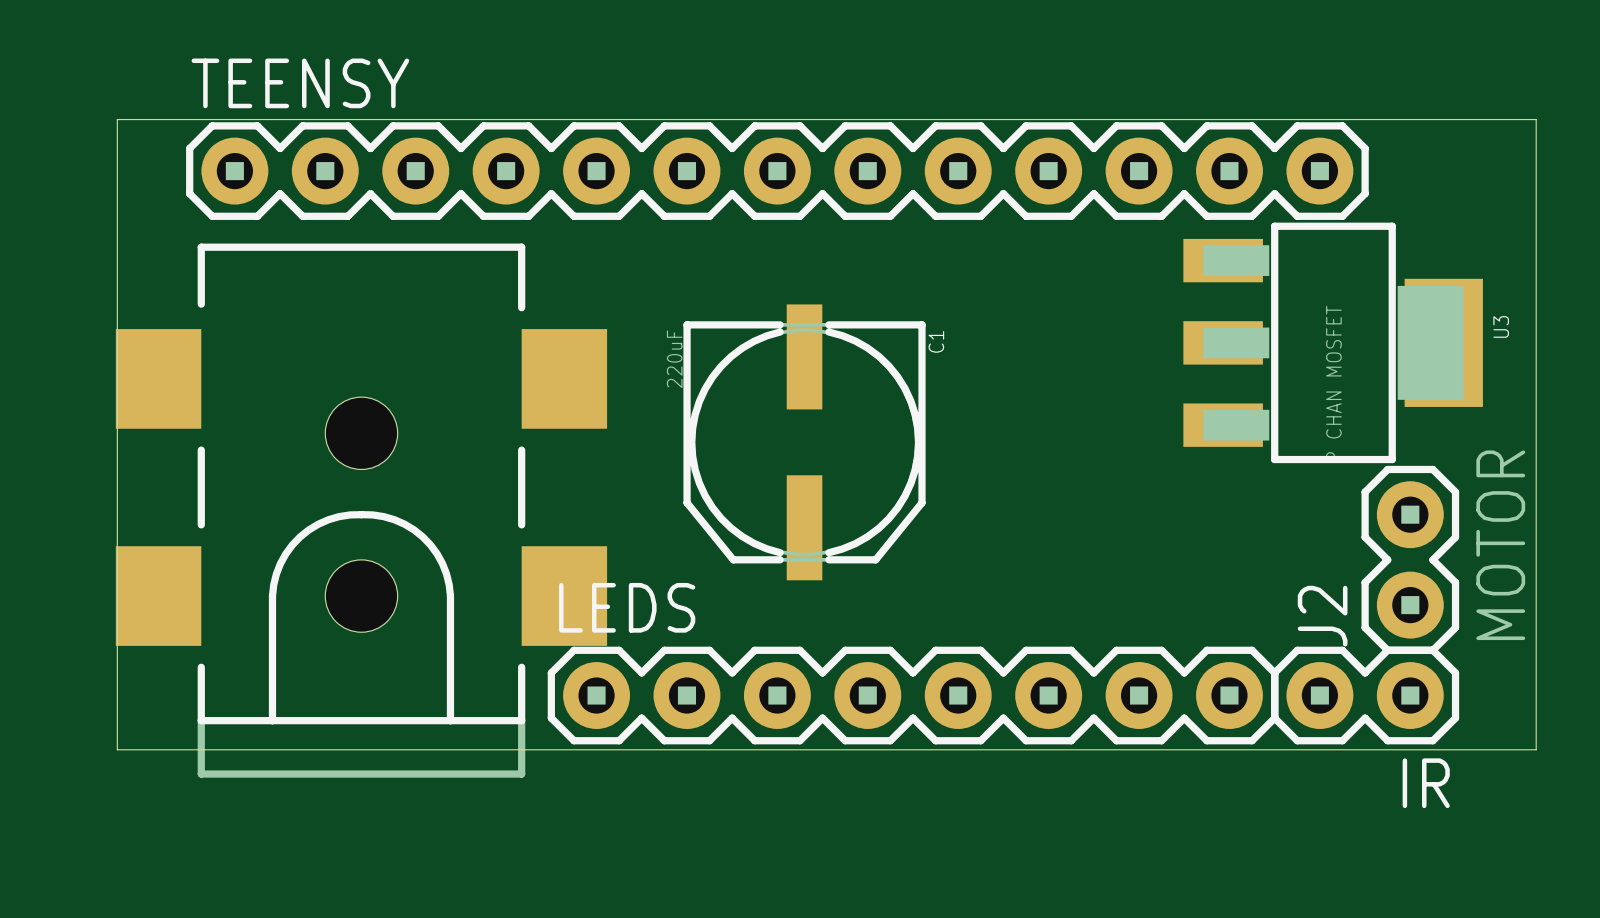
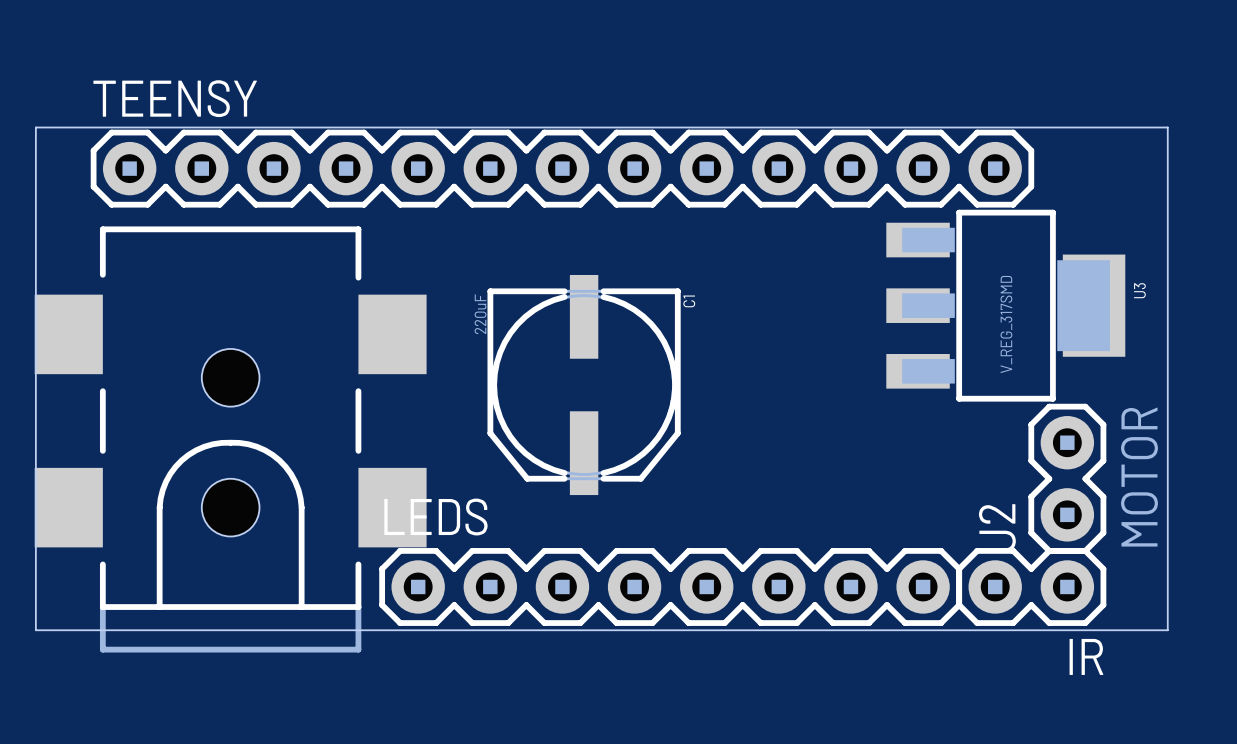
U3 value: P CHAN MOSFET (1333, 383) -> V_REG_317SMD (1006, 324)

